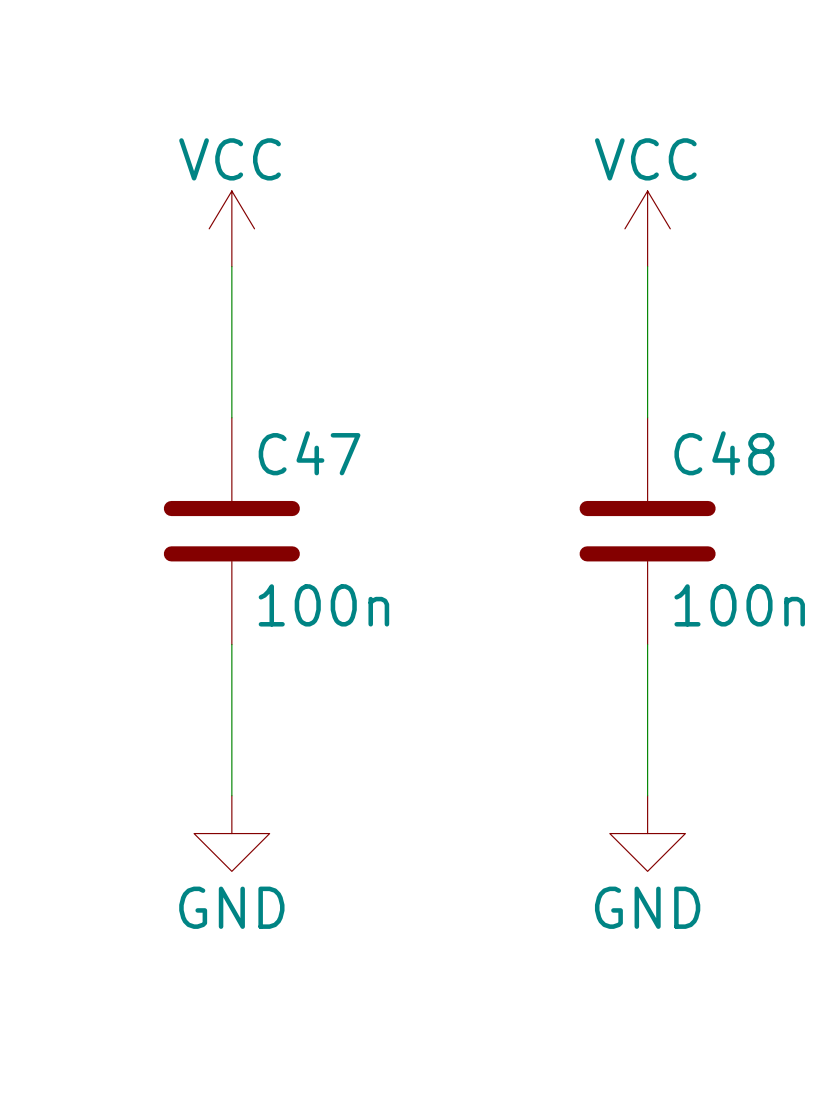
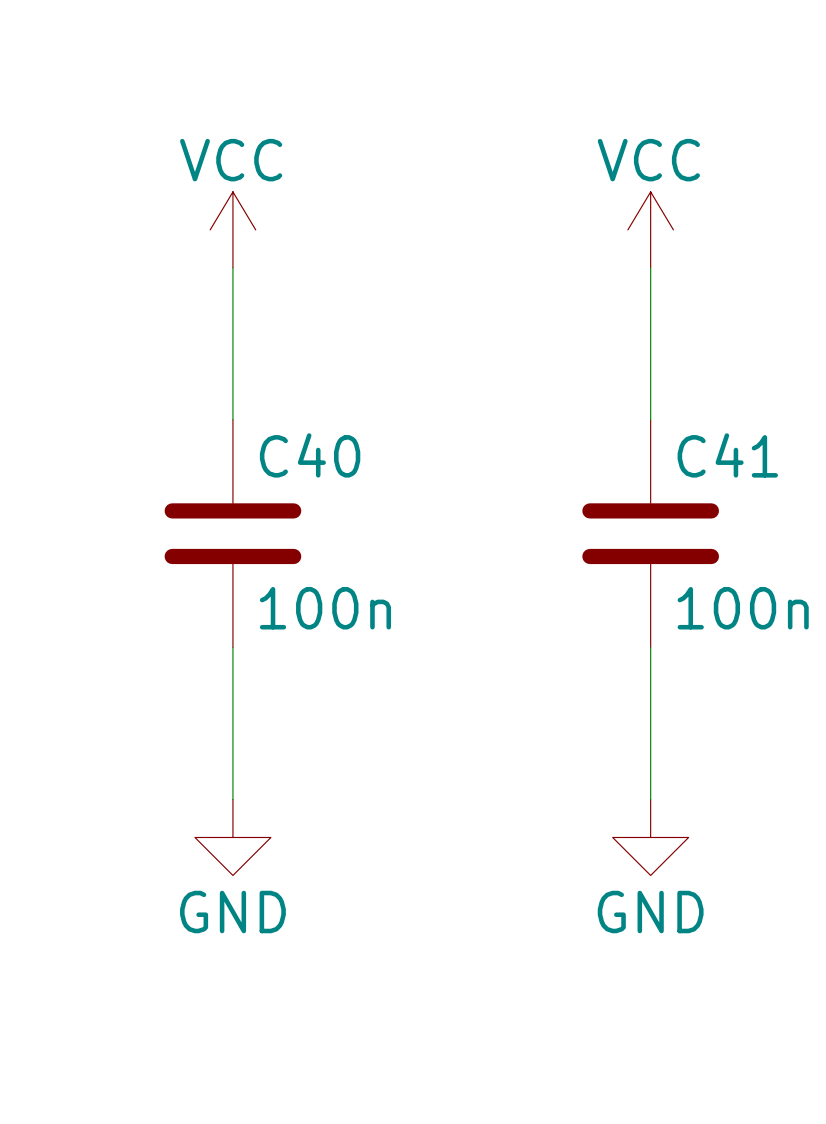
C47 name: C47 (309, 453) -> C40 (310, 455)
C48 name: C48 (724, 453) -> C41 (727, 455)

